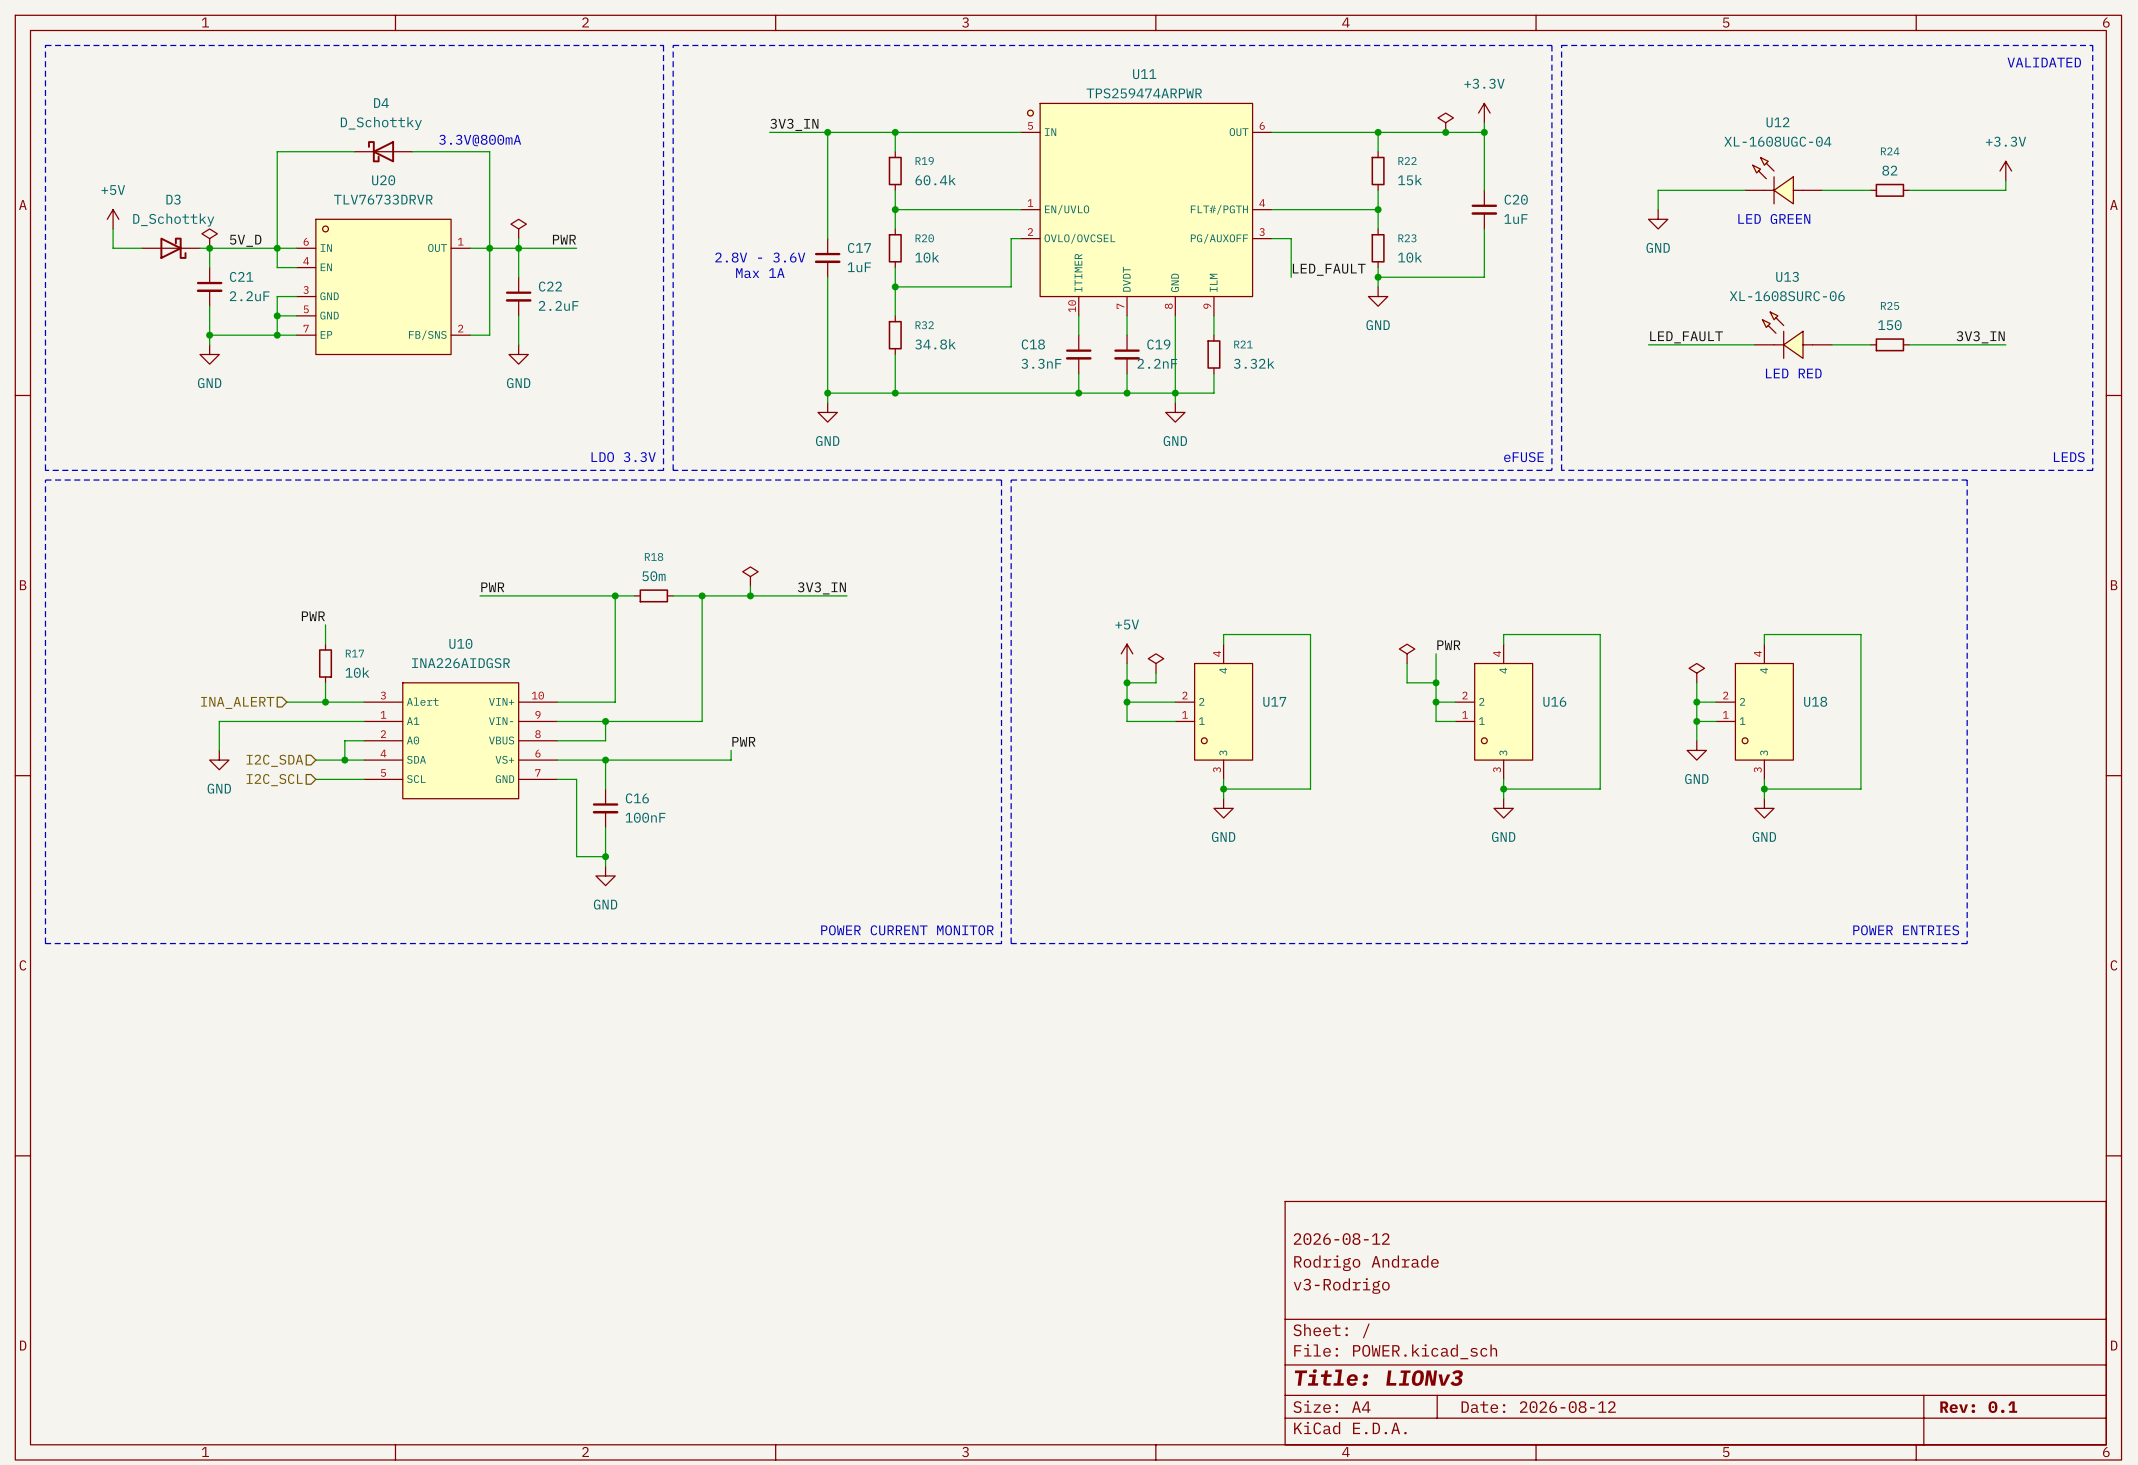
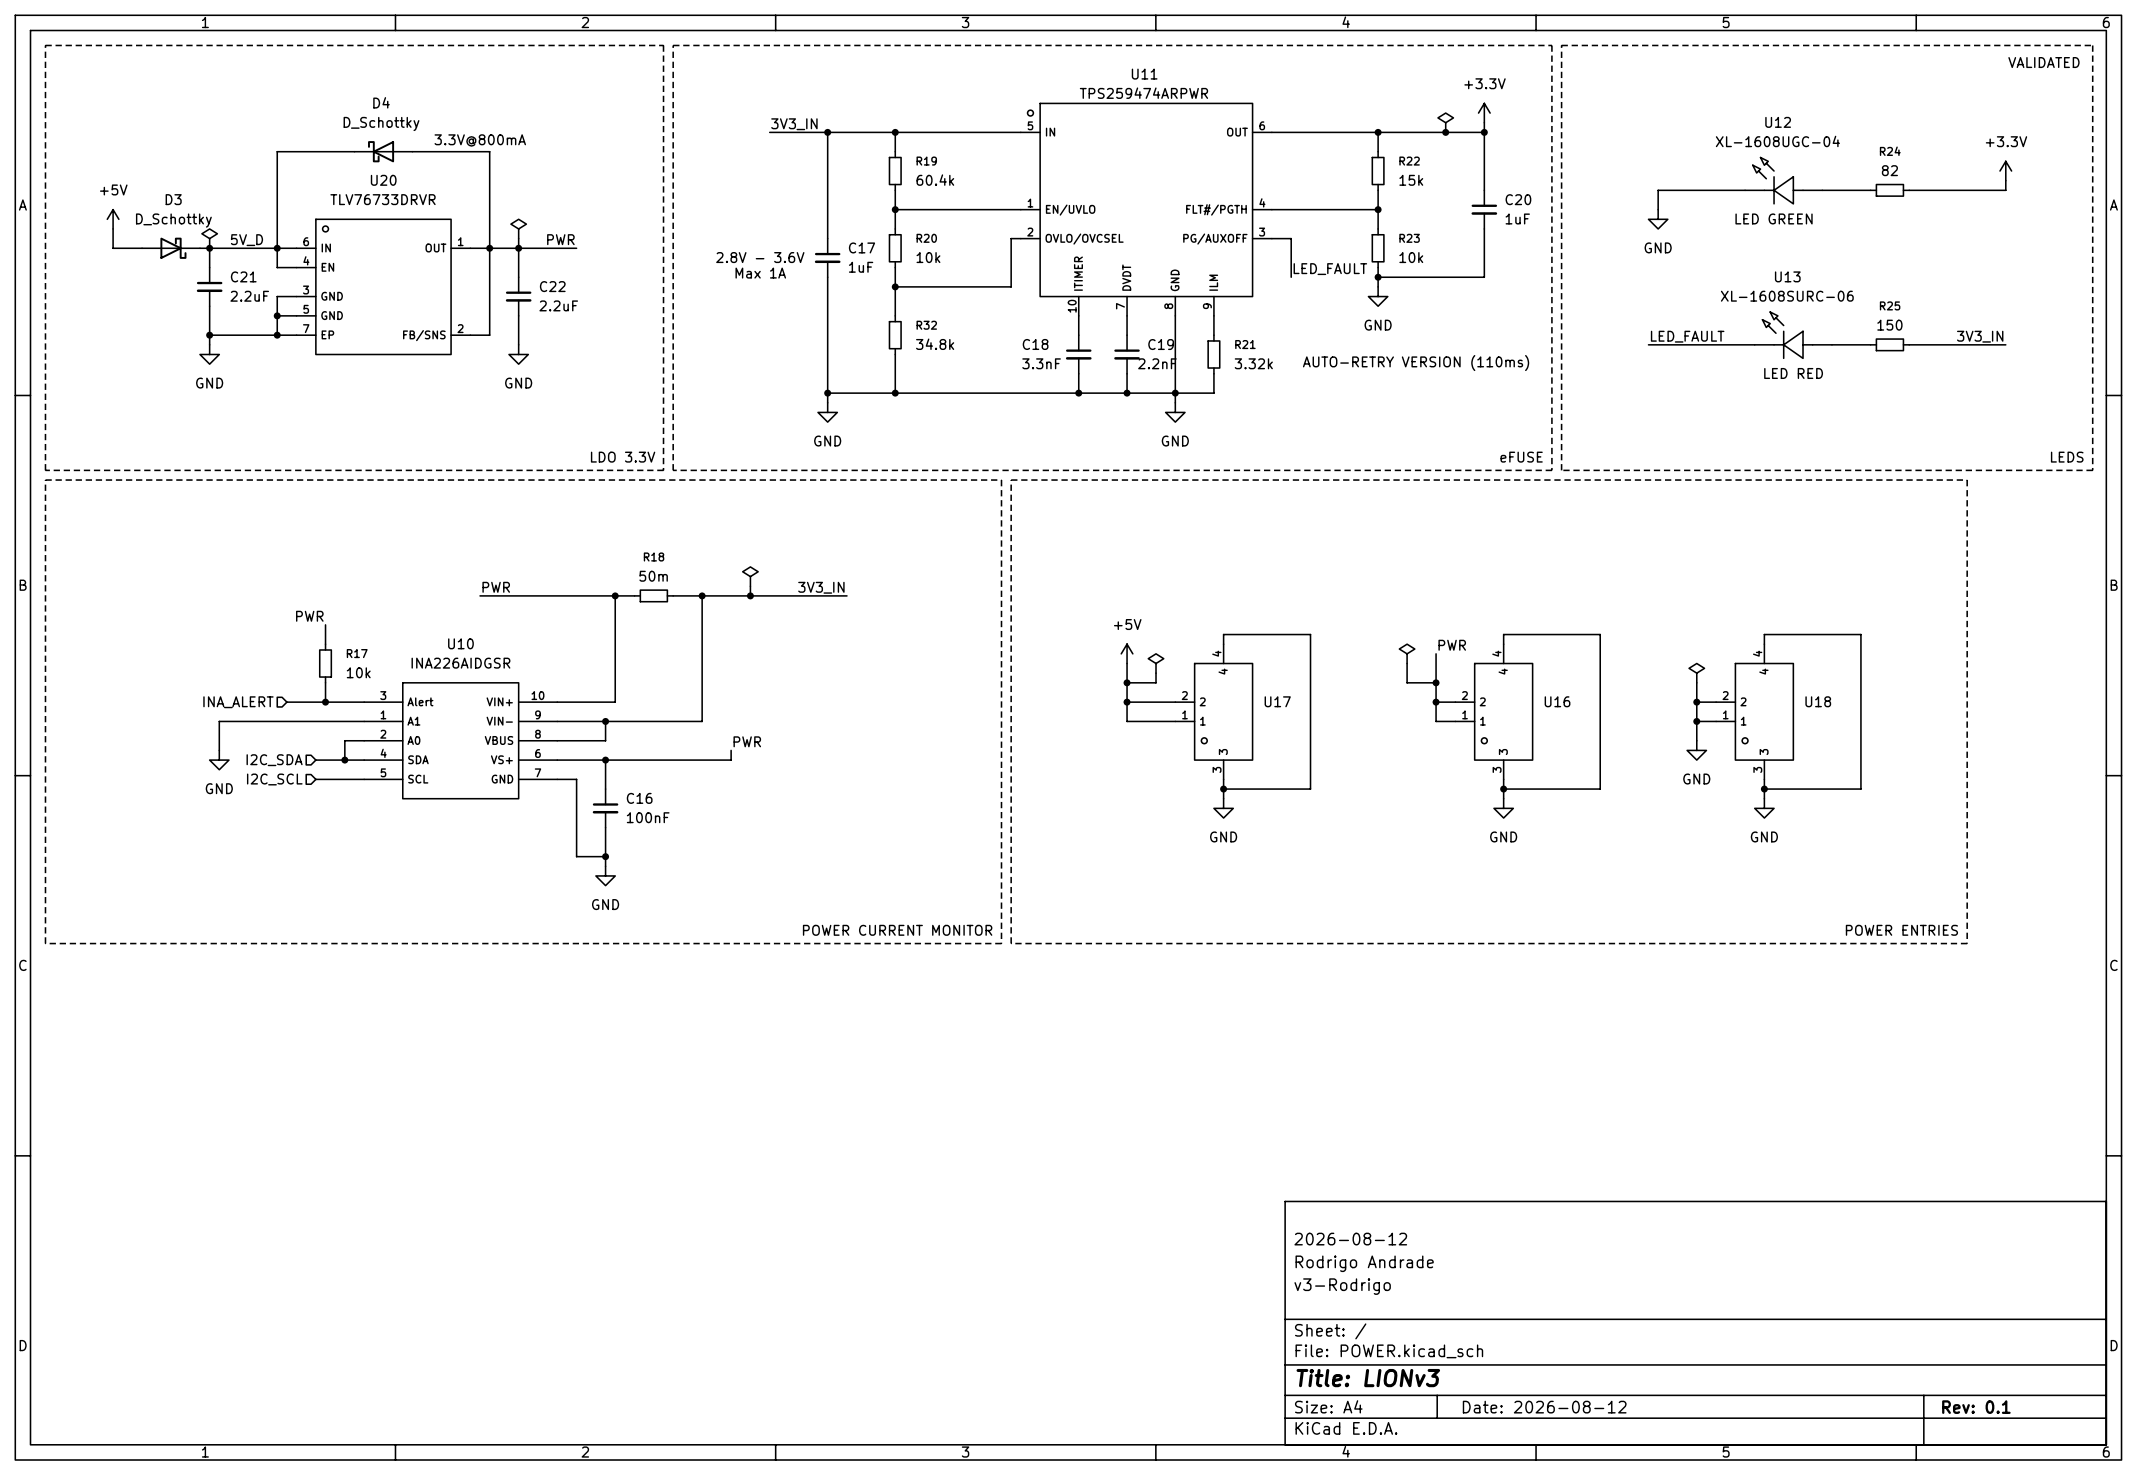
text: none -> AUTO-RETRY VERSION (110ms) (1416, 363)

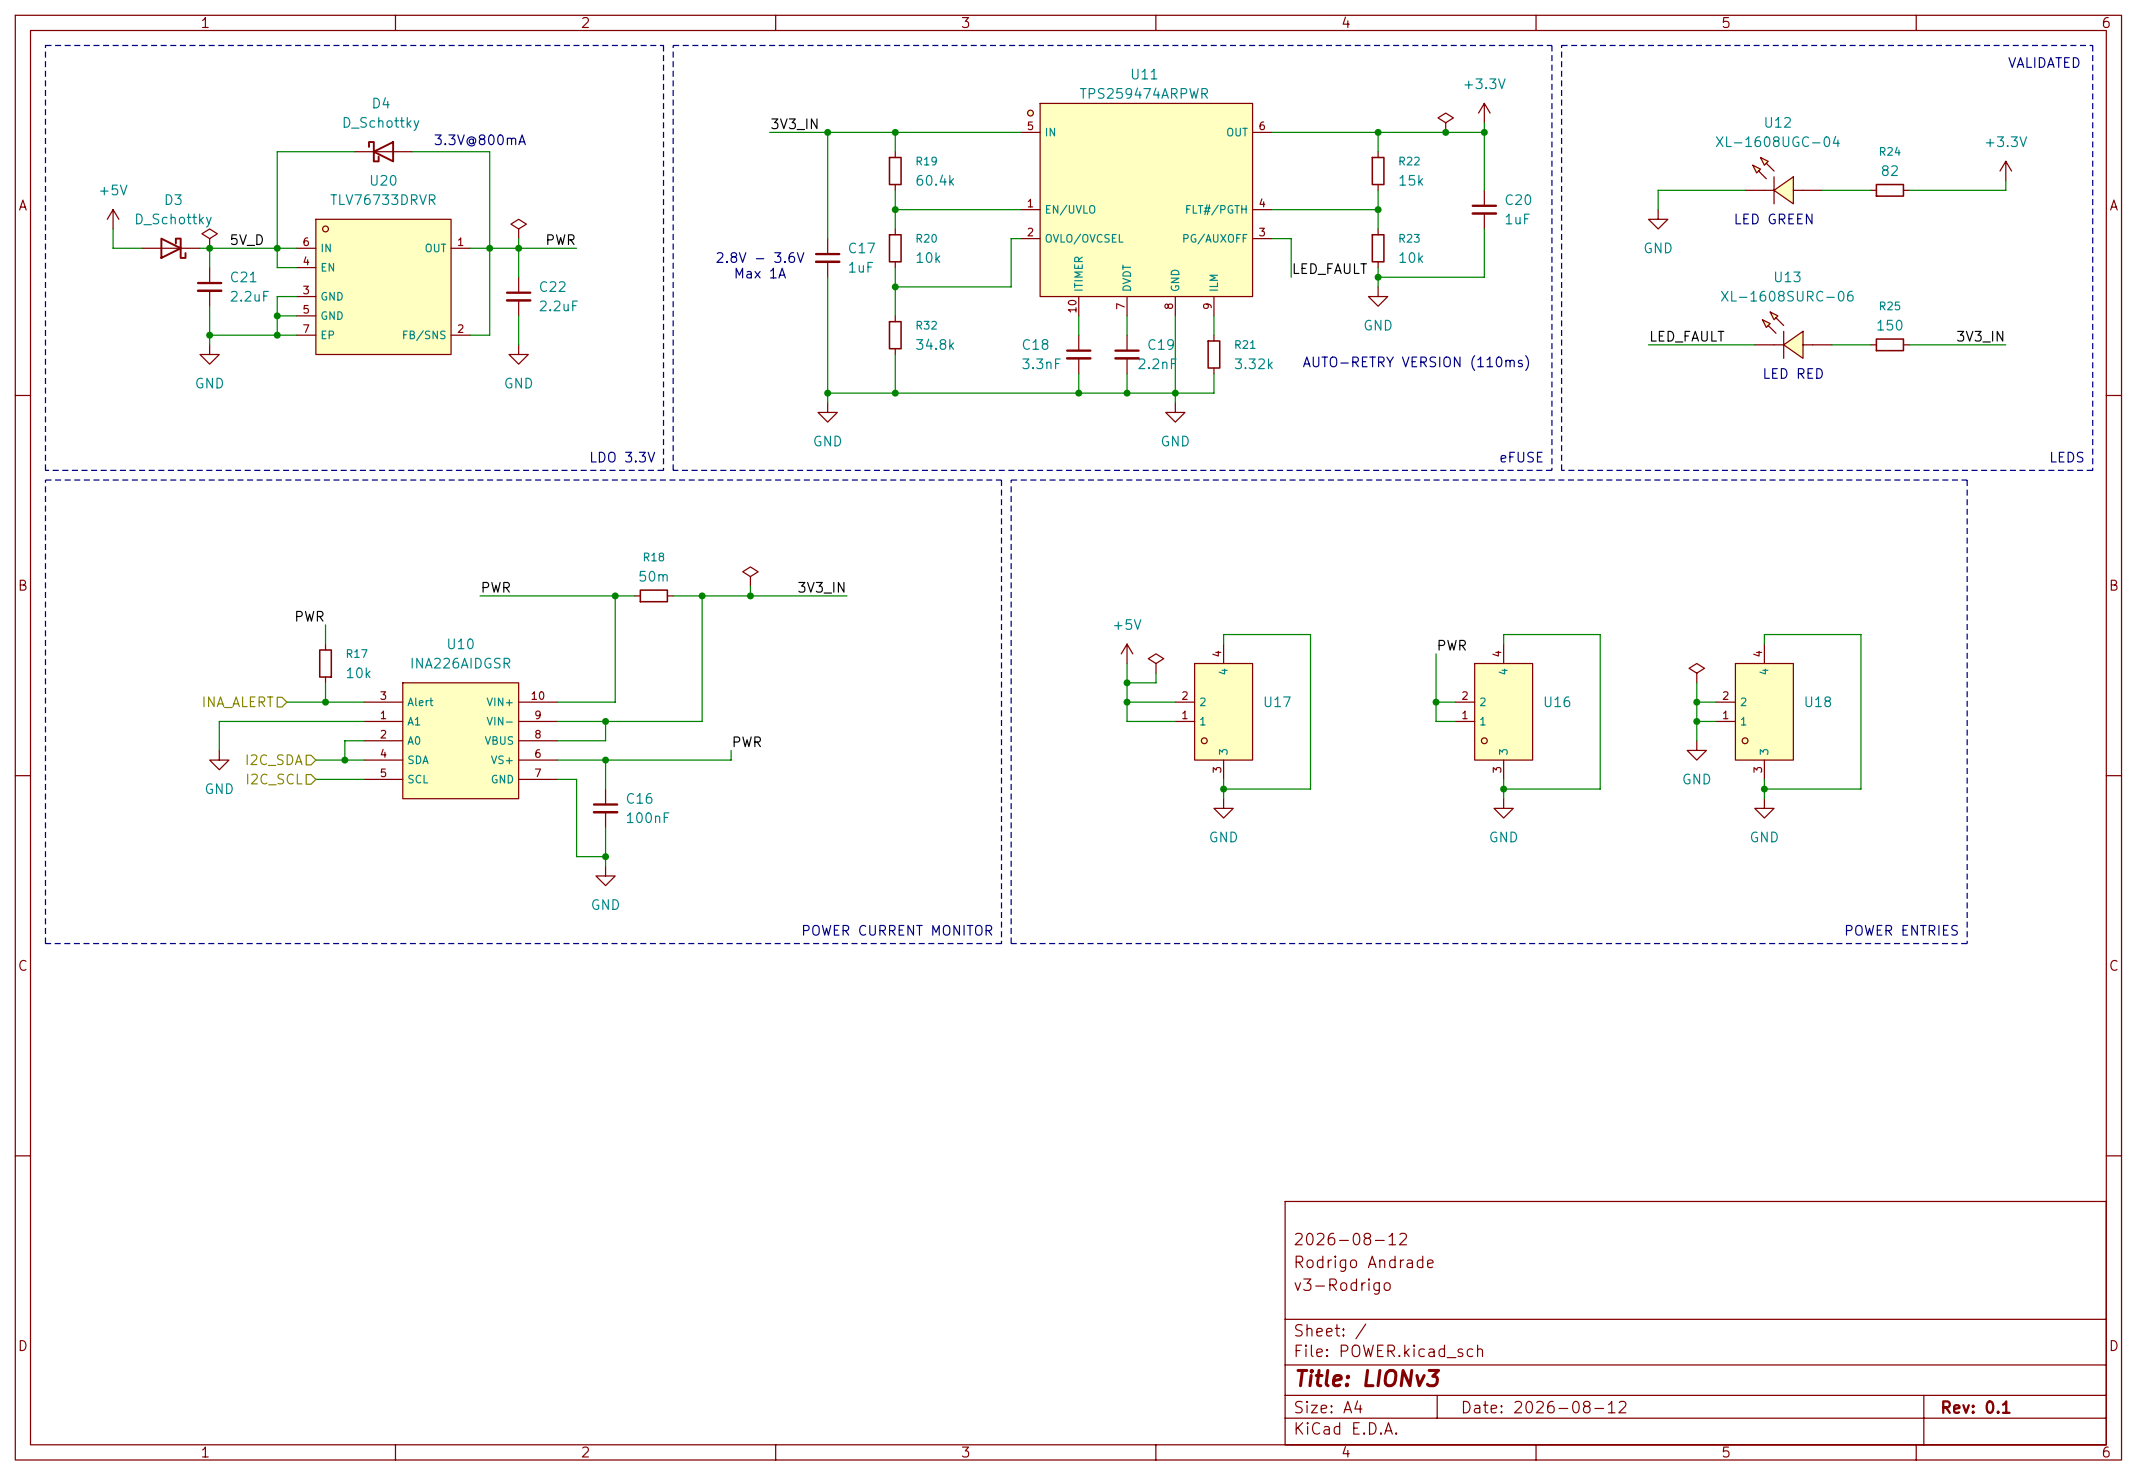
power symbol: (1407, 653) -> none
wire: (1407, 663) (1407, 682) (1436, 682) -> none
junction: (1436, 682) -> none

